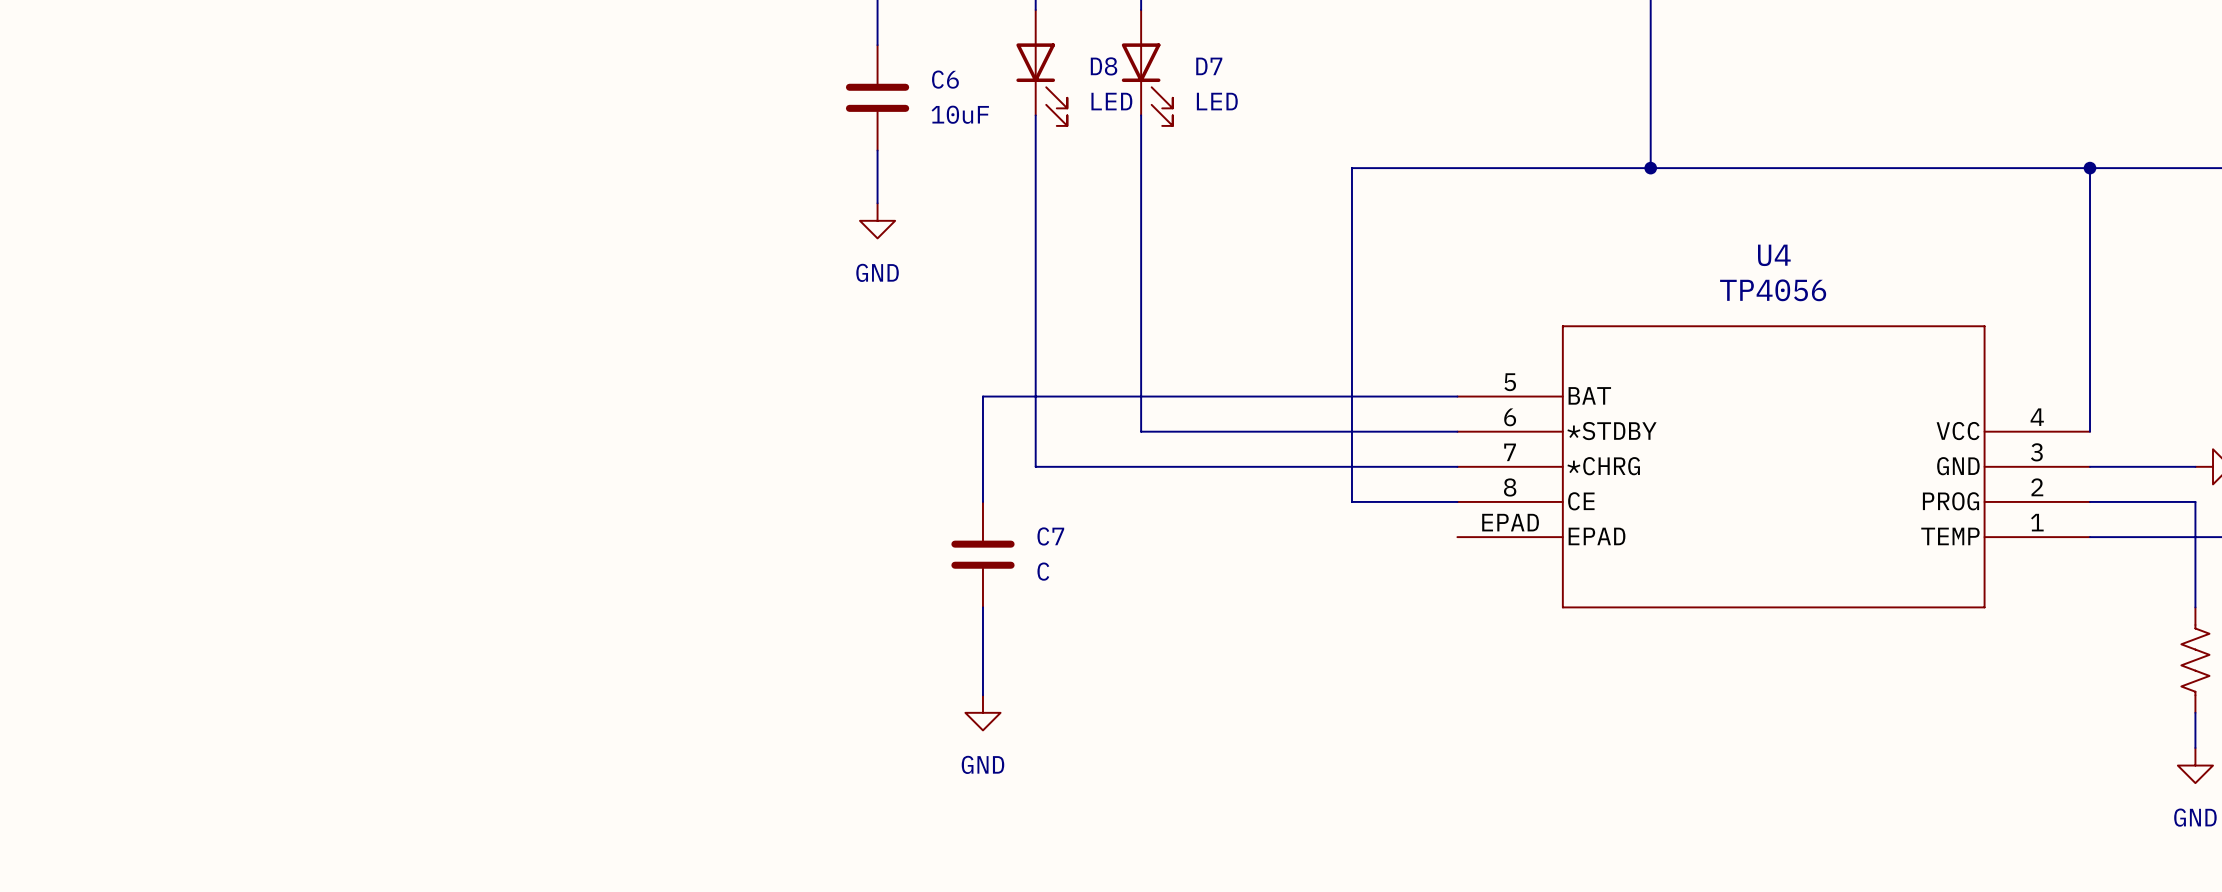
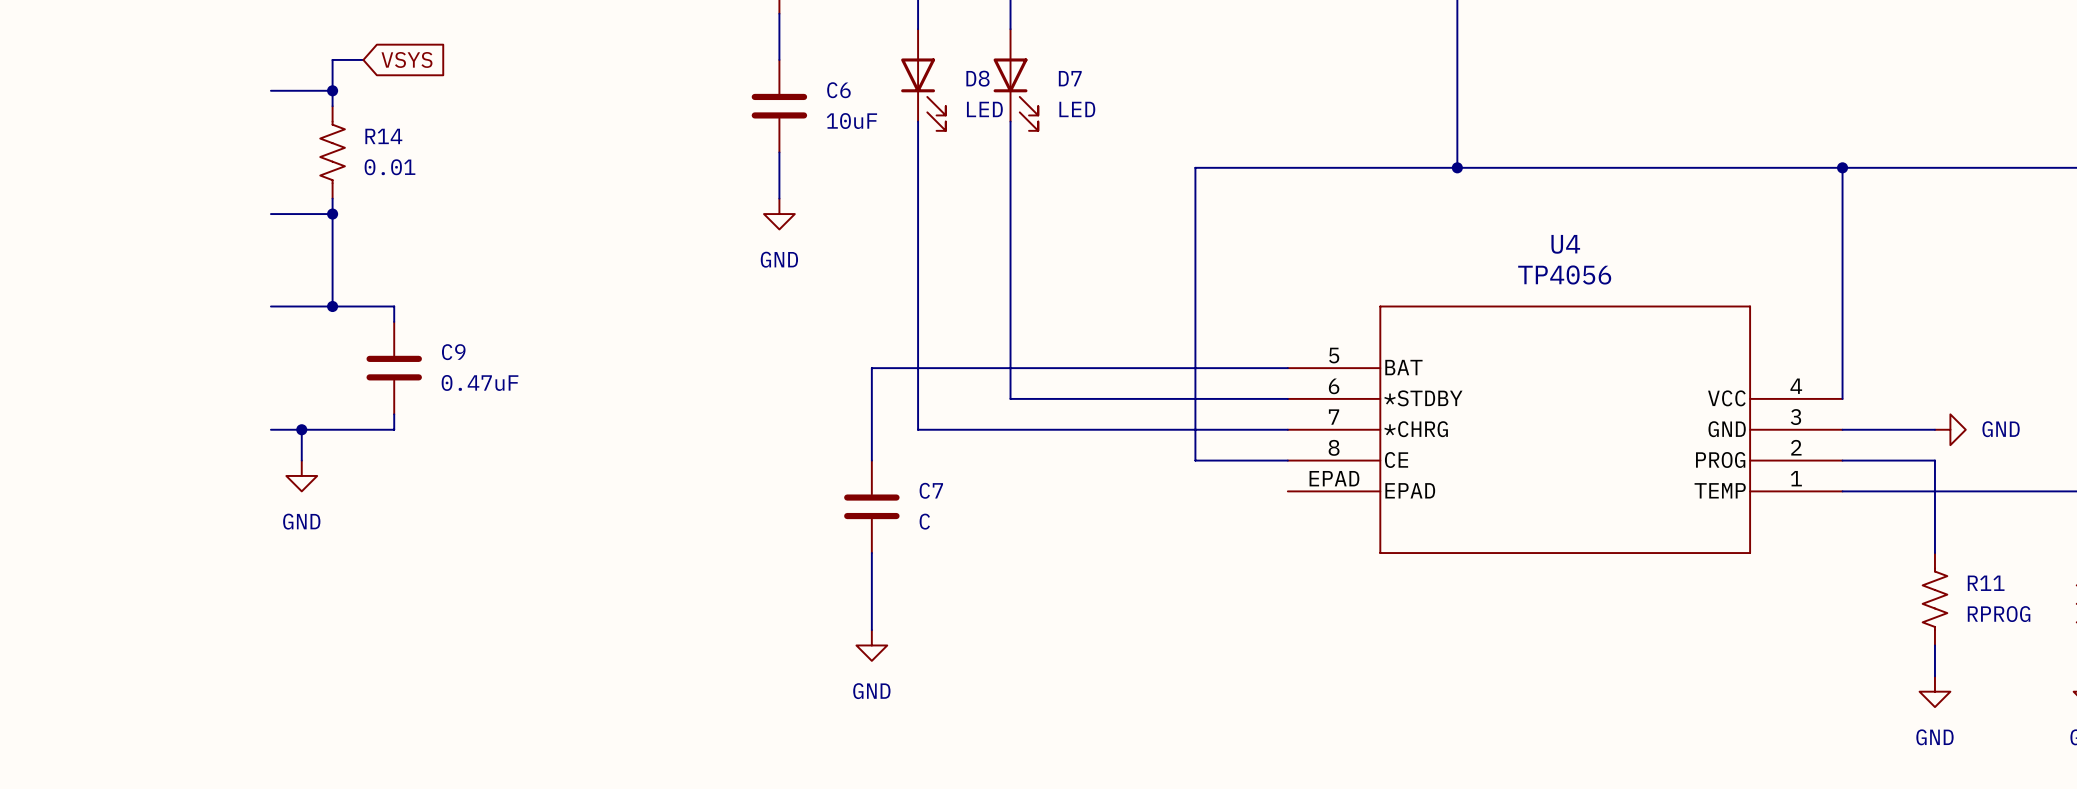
wire: none -> (363, 59) (332, 59) (332, 106)
global label: none -> VSYS (406, 59)
wire: none -> (270, 90) (332, 90)
junction: none -> (332, 90)
R14: none -> 0.01 (332, 152)
wire: none -> (332, 198) (332, 306)
wire: none -> (270, 214) (332, 214)
junction: none -> (332, 214)
wire: none -> (270, 306) (394, 306) (394, 321)
junction: none -> (332, 306)
C9: none -> 0.47uF (394, 368)
wire: none -> (394, 414) (394, 429) (270, 429)
wire: none -> (301, 429) (301, 460)
junction: none -> (301, 429)
power symbol: none -> GND (301, 475)

